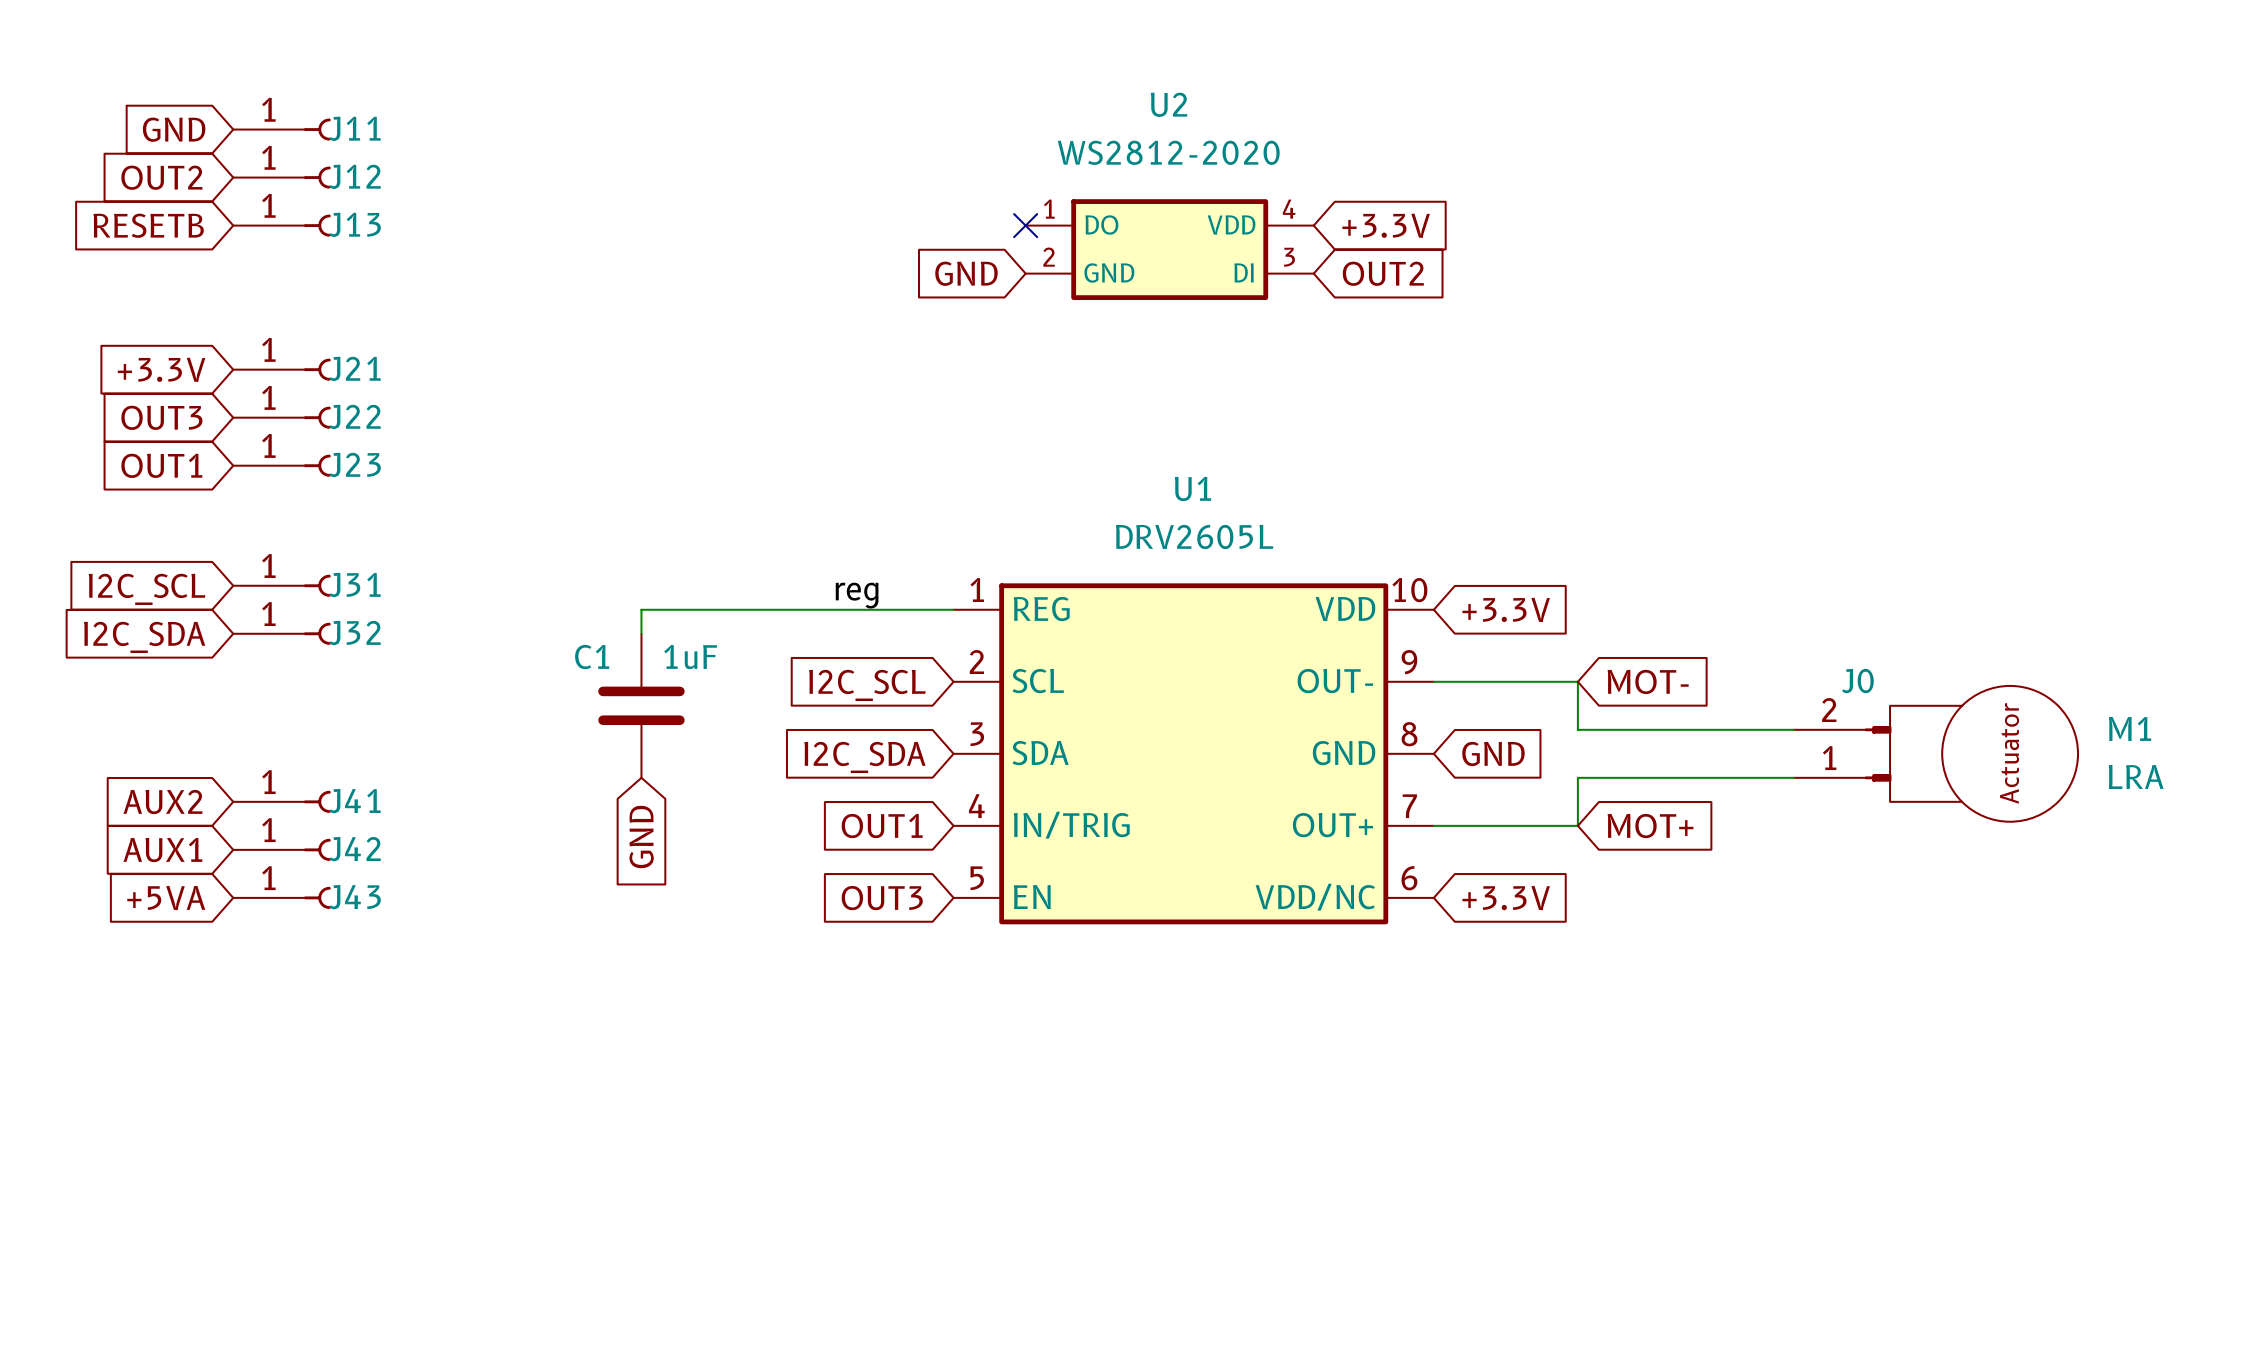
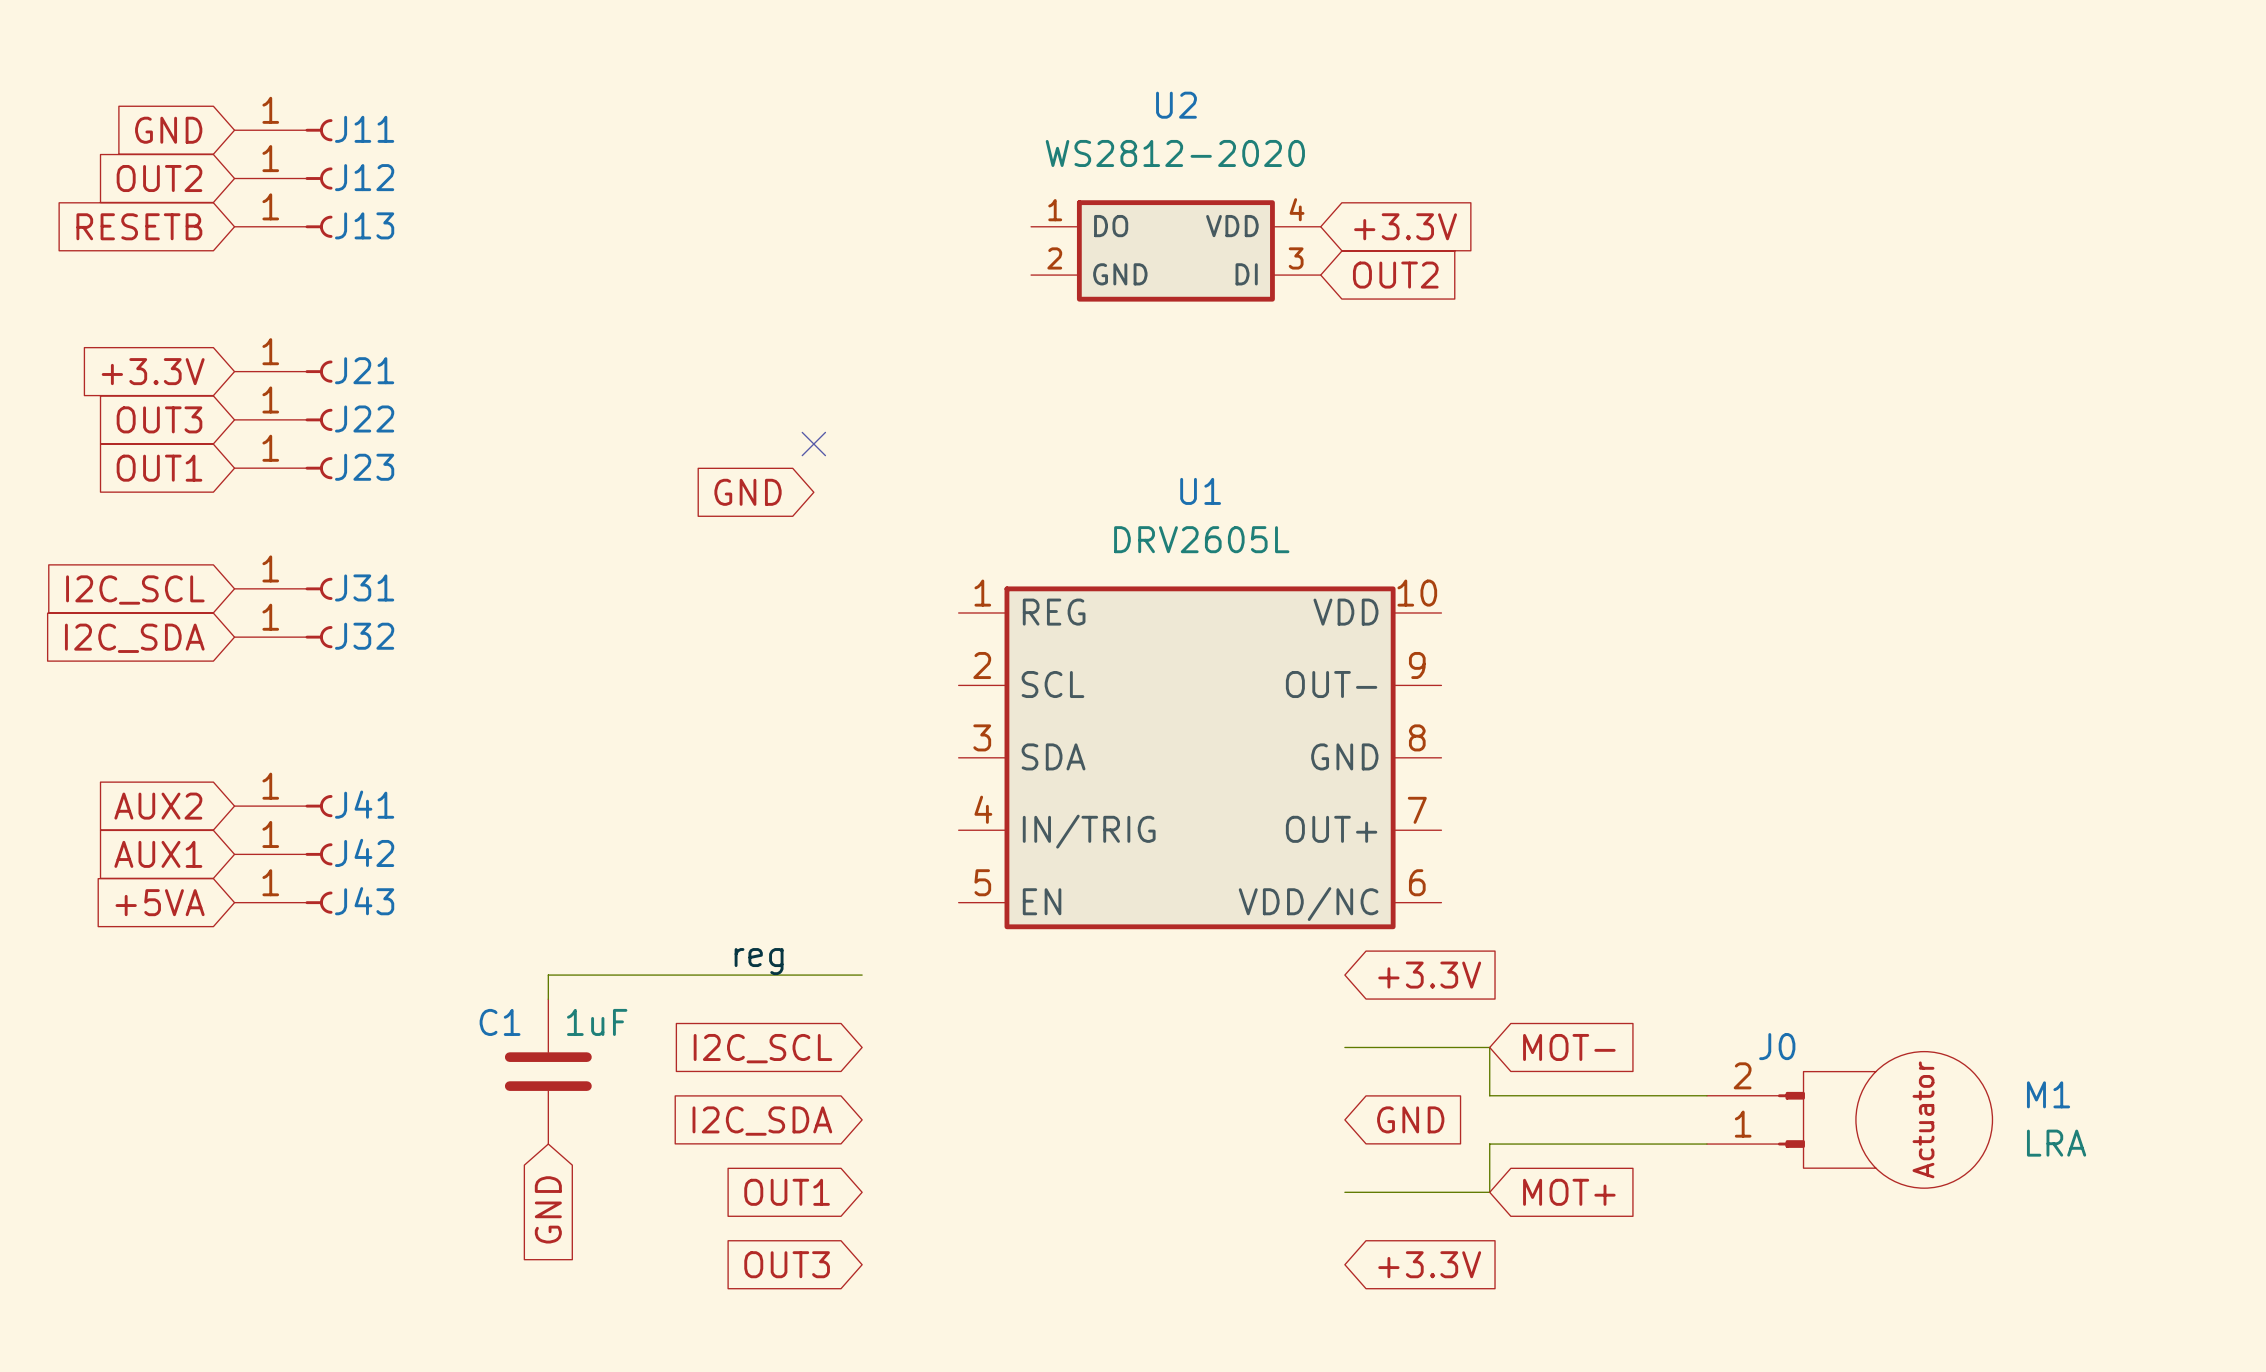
no-connect mark: (1025, 225) -> none
global label: GND (966, 273) -> none
no-connect mark: none -> (813, 444)
global label: none -> GND (748, 492)
label position: reg (857, 595) -> reg (759, 961)
wire: (953, 609) (641, 609) (641, 633) -> (862, 975) (548, 975) (548, 999)
global label: +3.3V (1506, 609) -> none
wire: (1433, 681) (1577, 681) (1577, 729) (1794, 729) -> (1344, 1047) (1489, 1047) (1489, 1095) (1706, 1095)
global label position: MOT- (1648, 681) -> MOT- (1569, 1047)
global label position: I2C_SCL (867, 685) -> I2C_SCL (762, 1048)
C1 position: (641, 705) -> (548, 1071)
global label: GND (1493, 753) -> none
J0 position: (1842, 753) -> (1755, 1119)
M1 position: (1984, 753) -> (1898, 1119)
global label position: I2C_SDA (864, 757) -> I2C_SDA (762, 1121)
wire: (1794, 777) (1577, 777) (1577, 825) (1433, 825) -> (1706, 1144) (1489, 1144) (1489, 1192) (1344, 1192)
global label position: OUT1 (882, 826) -> OUT1 (787, 1192)
global label position: MOT+ (1650, 826) -> MOT+ (1569, 1192)
global label: GND (641, 837) -> none
global label position: OUT3 (882, 898) -> OUT3 (787, 1264)
global label position: +3.3V (1506, 898) -> +3.3V (1429, 975)
global label: none -> GND (1410, 1119)
global label: none -> GND (548, 1209)
global label: none -> +3.3V (1429, 1264)

